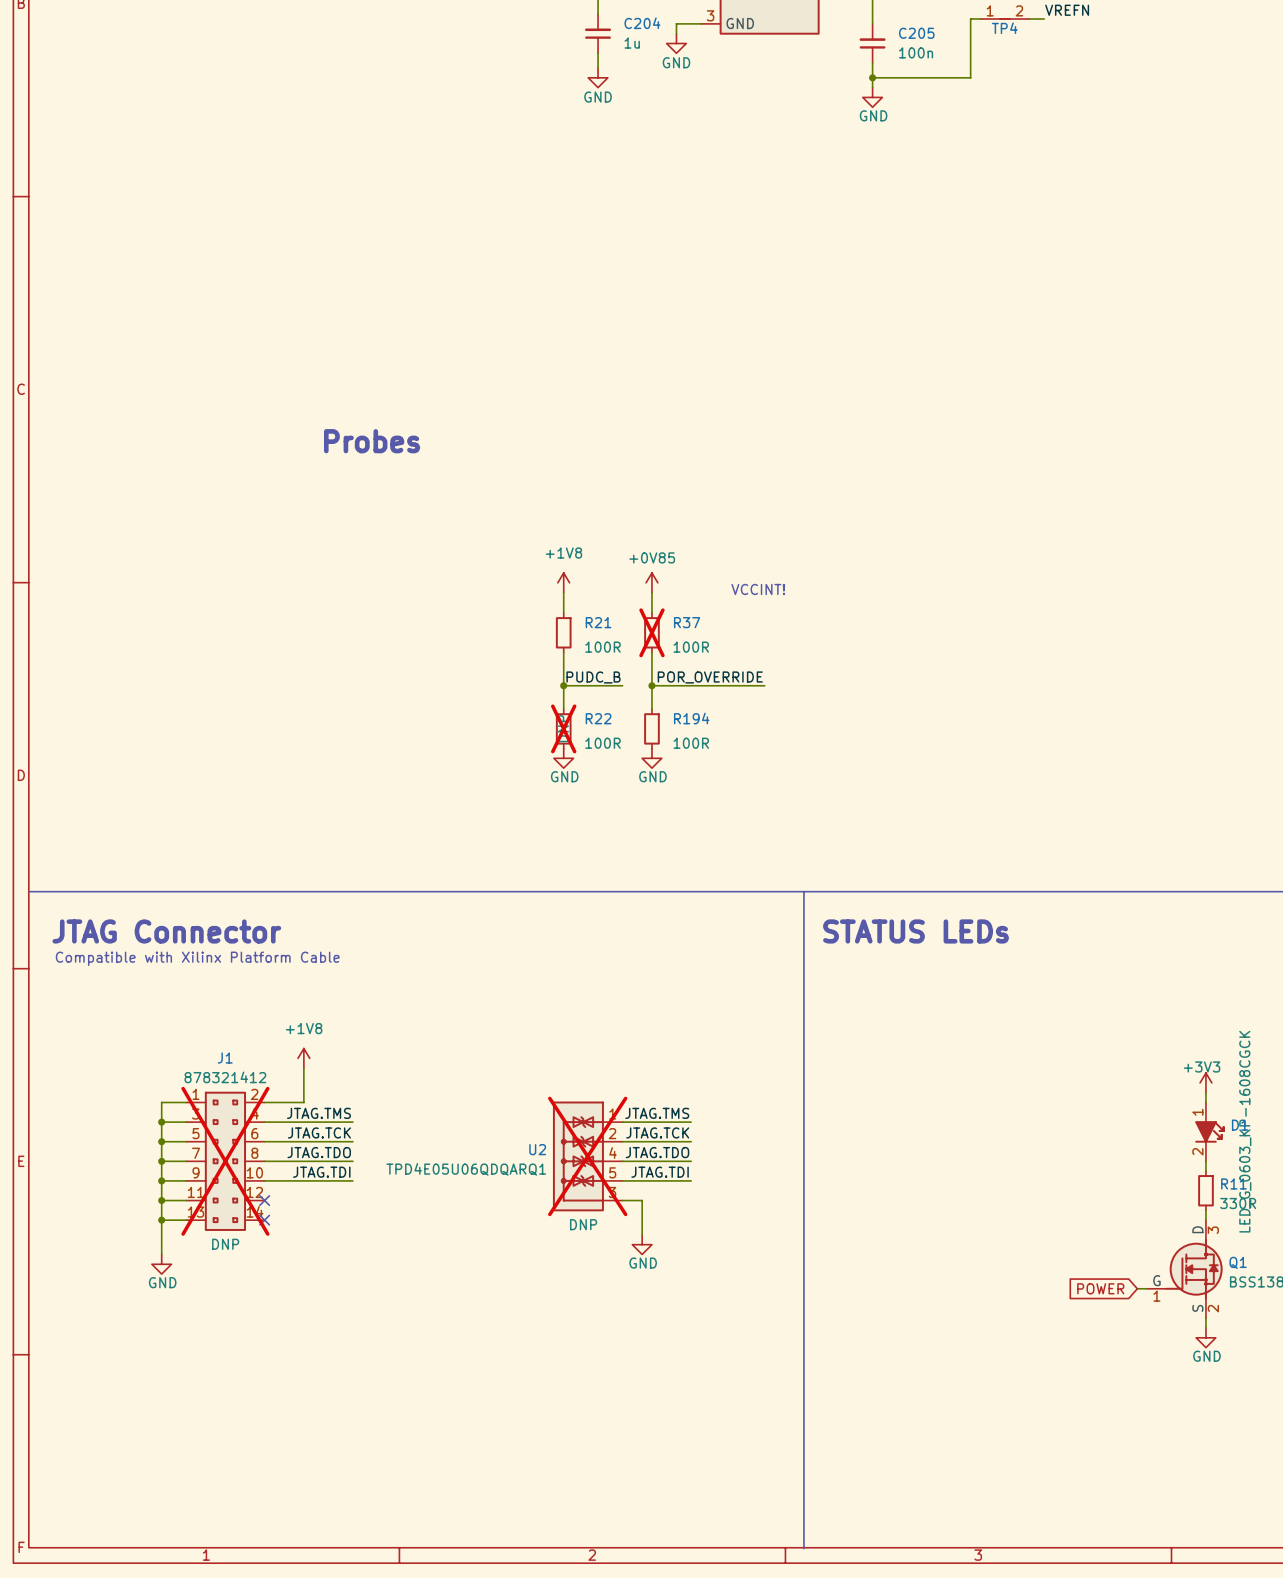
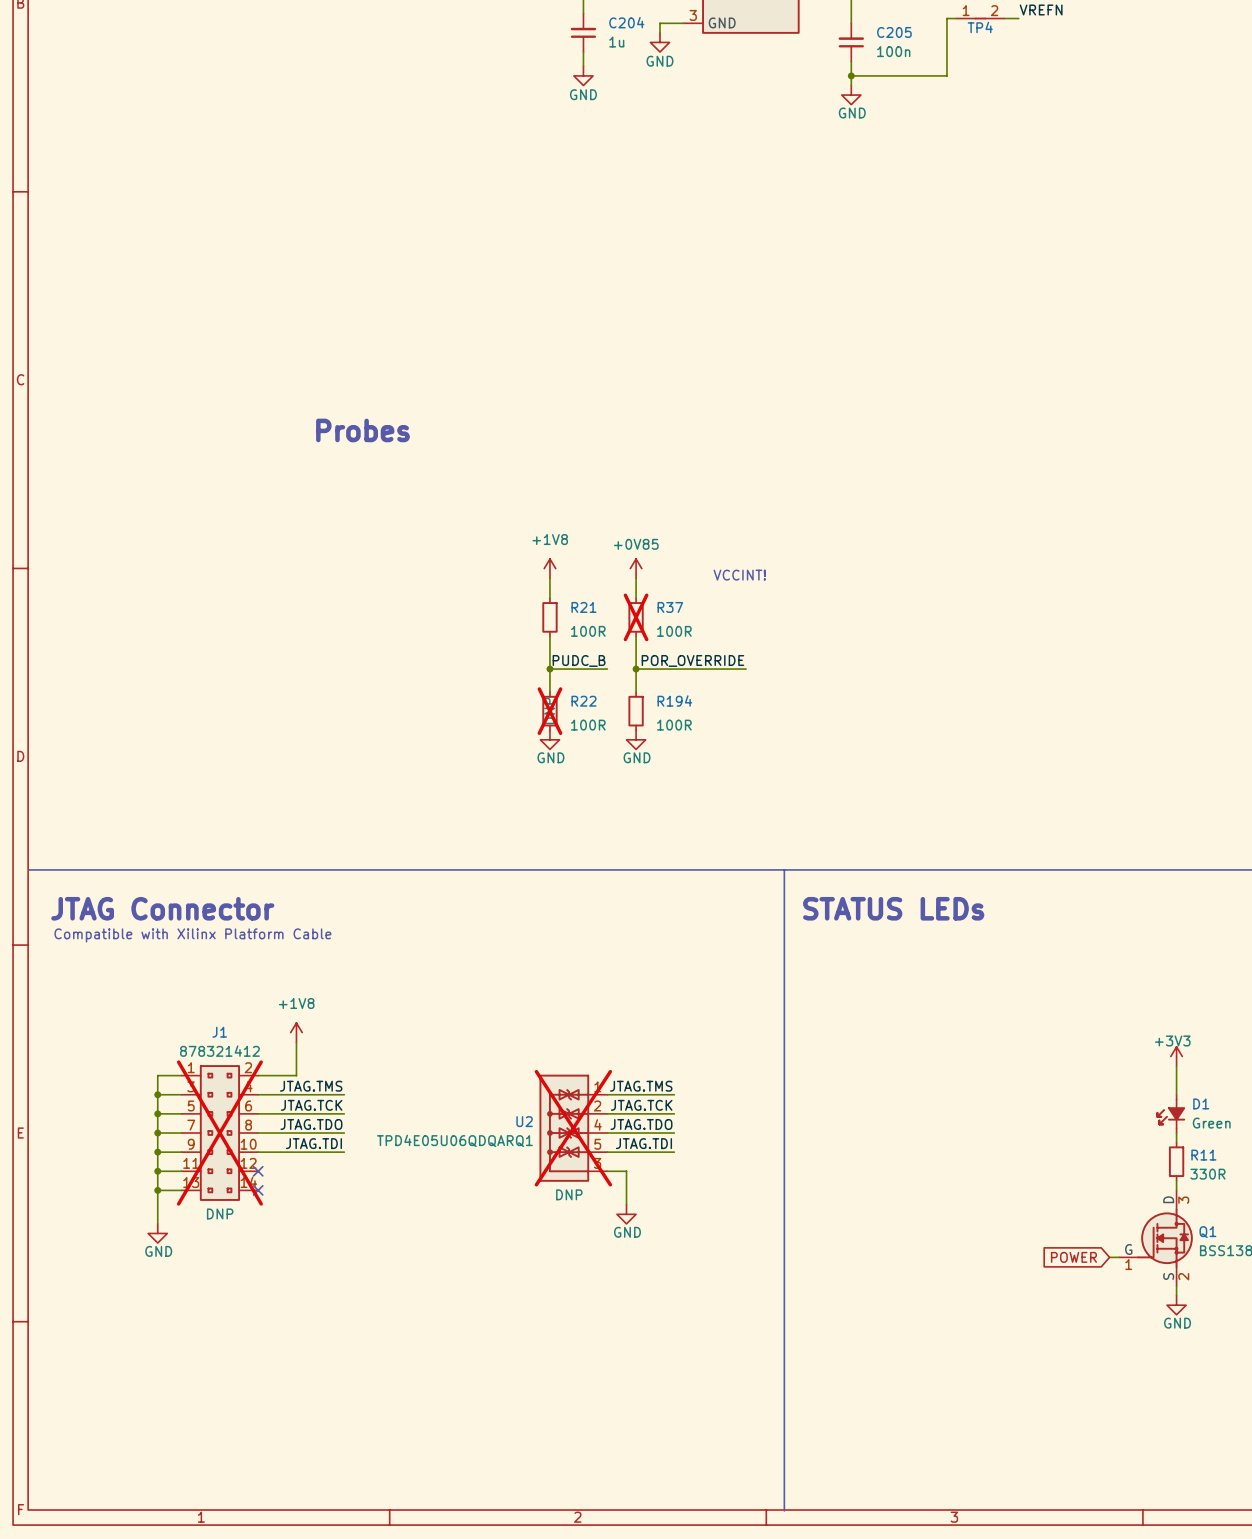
D1 symbol: [1195, 1102, 1225, 1162] -> [1156, 1094, 1186, 1134]
D1 value: LED_G_0603_KP-1608CGCK (1245, 1131) -> none
D1 text: none -> Green (1211, 1123)

